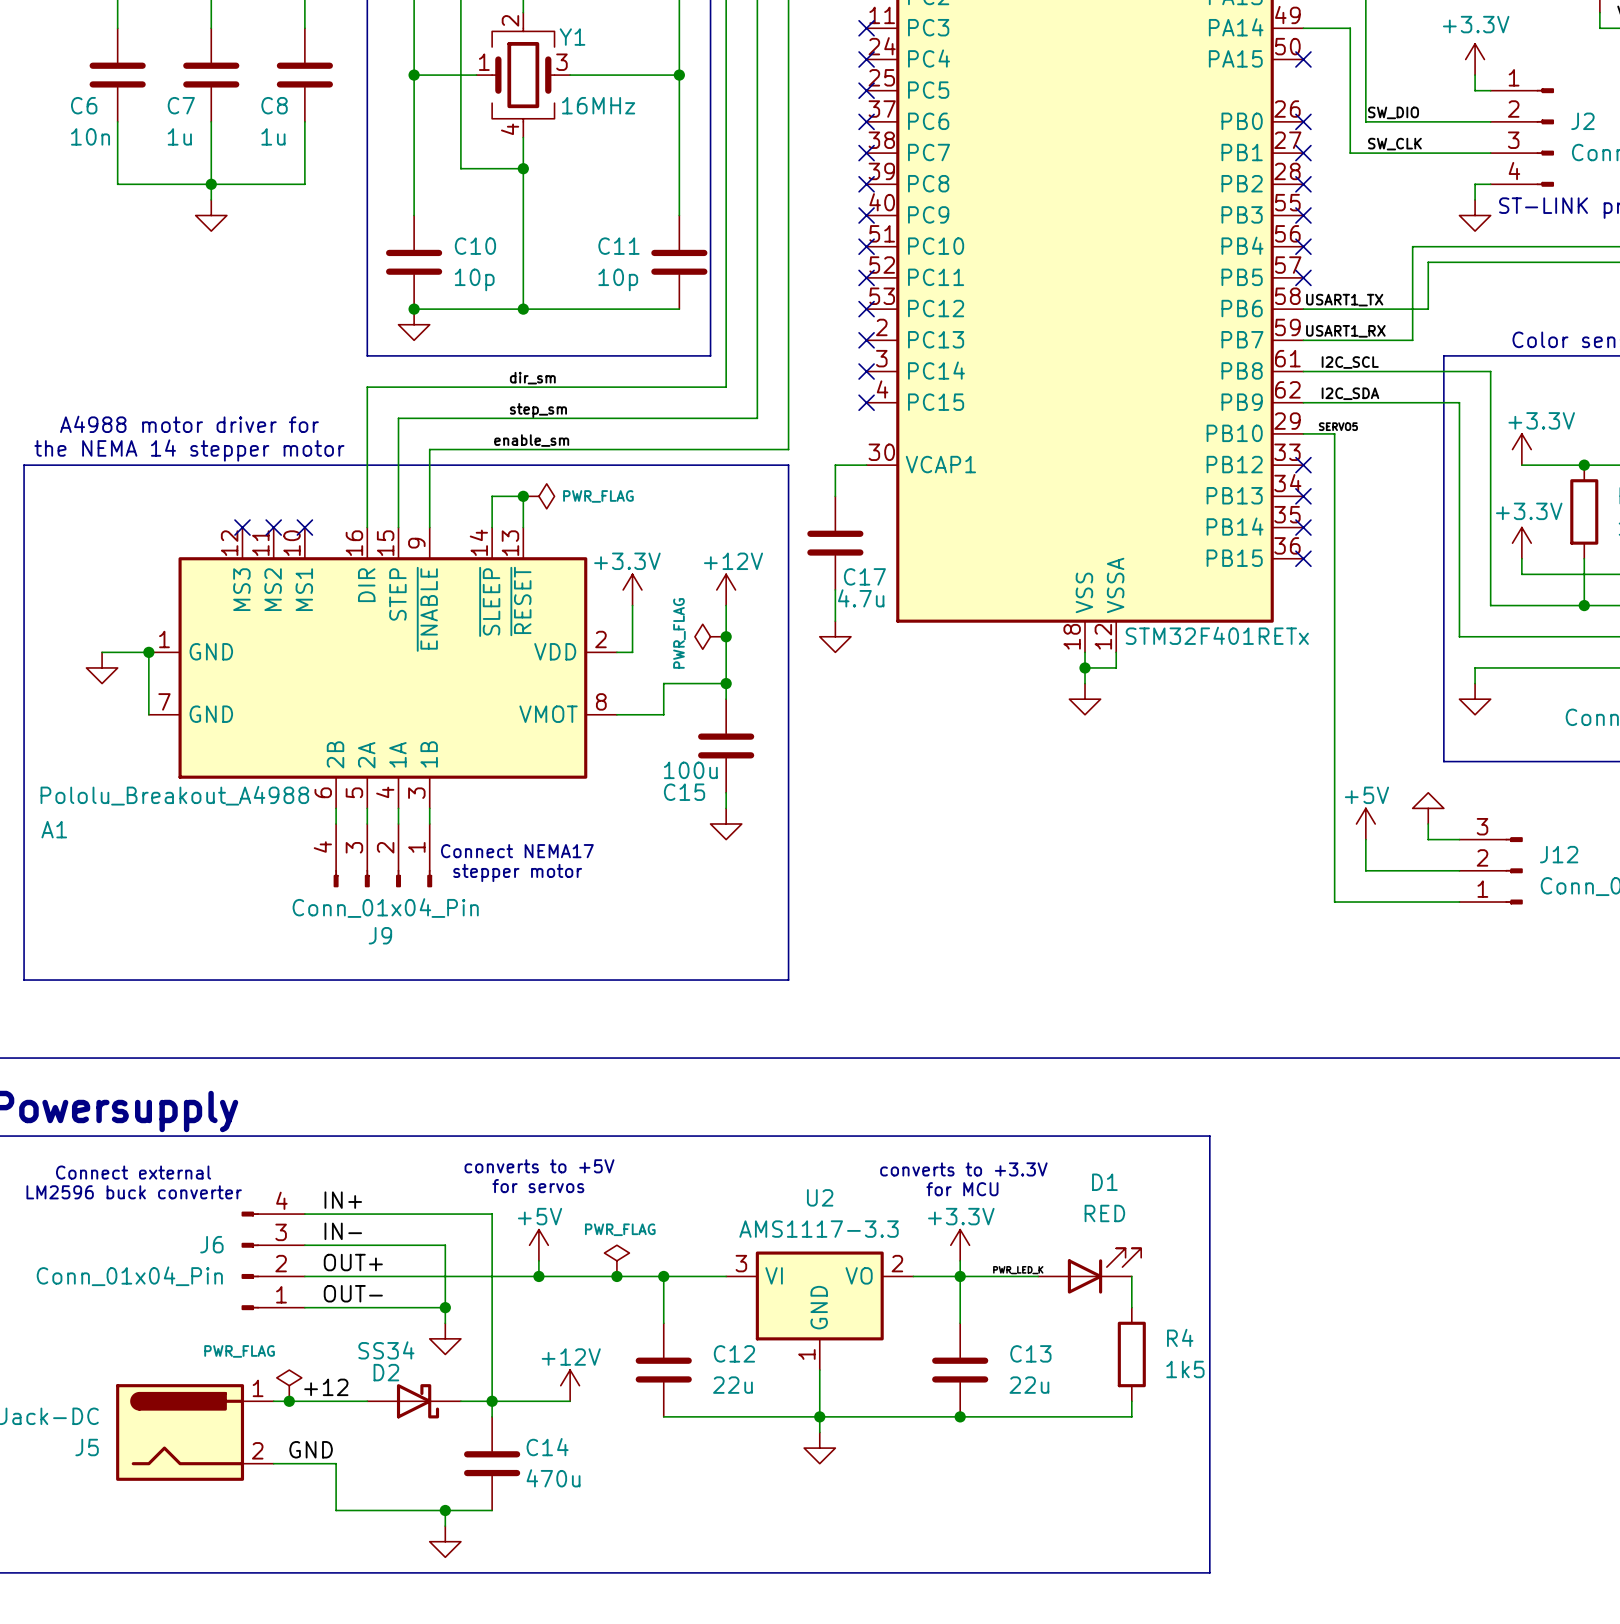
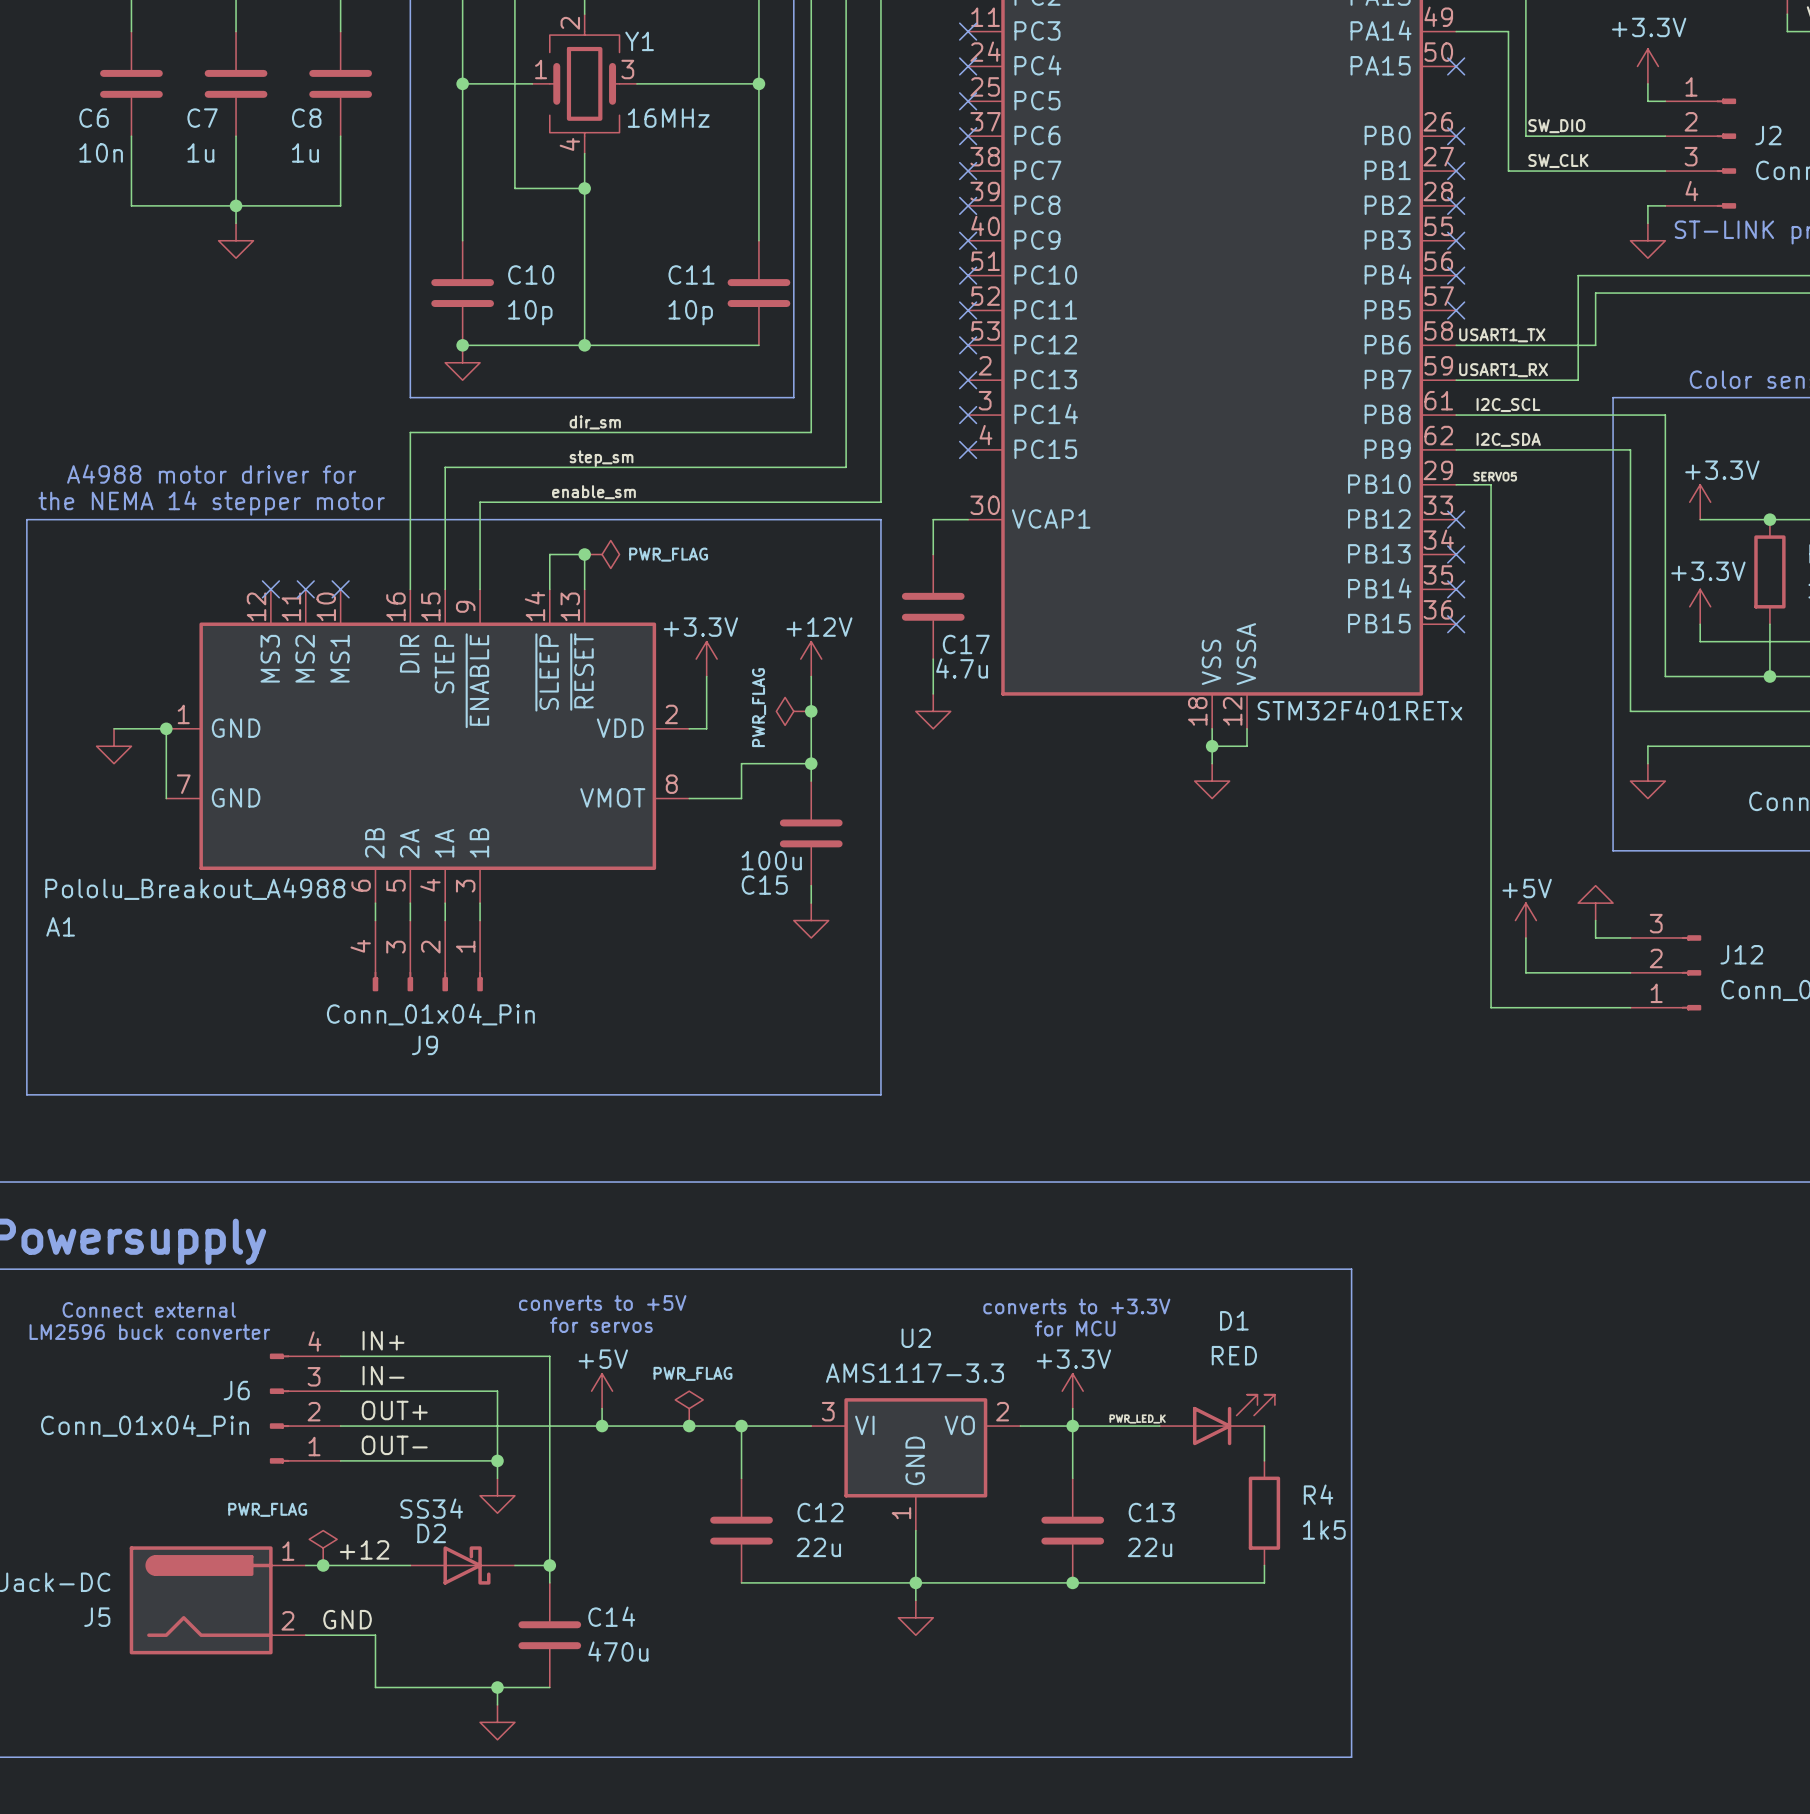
text: Connect NEMA17 (517, 851) -> none
text: stepper motor (517, 872) -> none
power symbol: +12V (570, 1385) -> none
wire: (492, 1401) (570, 1401) -> none

